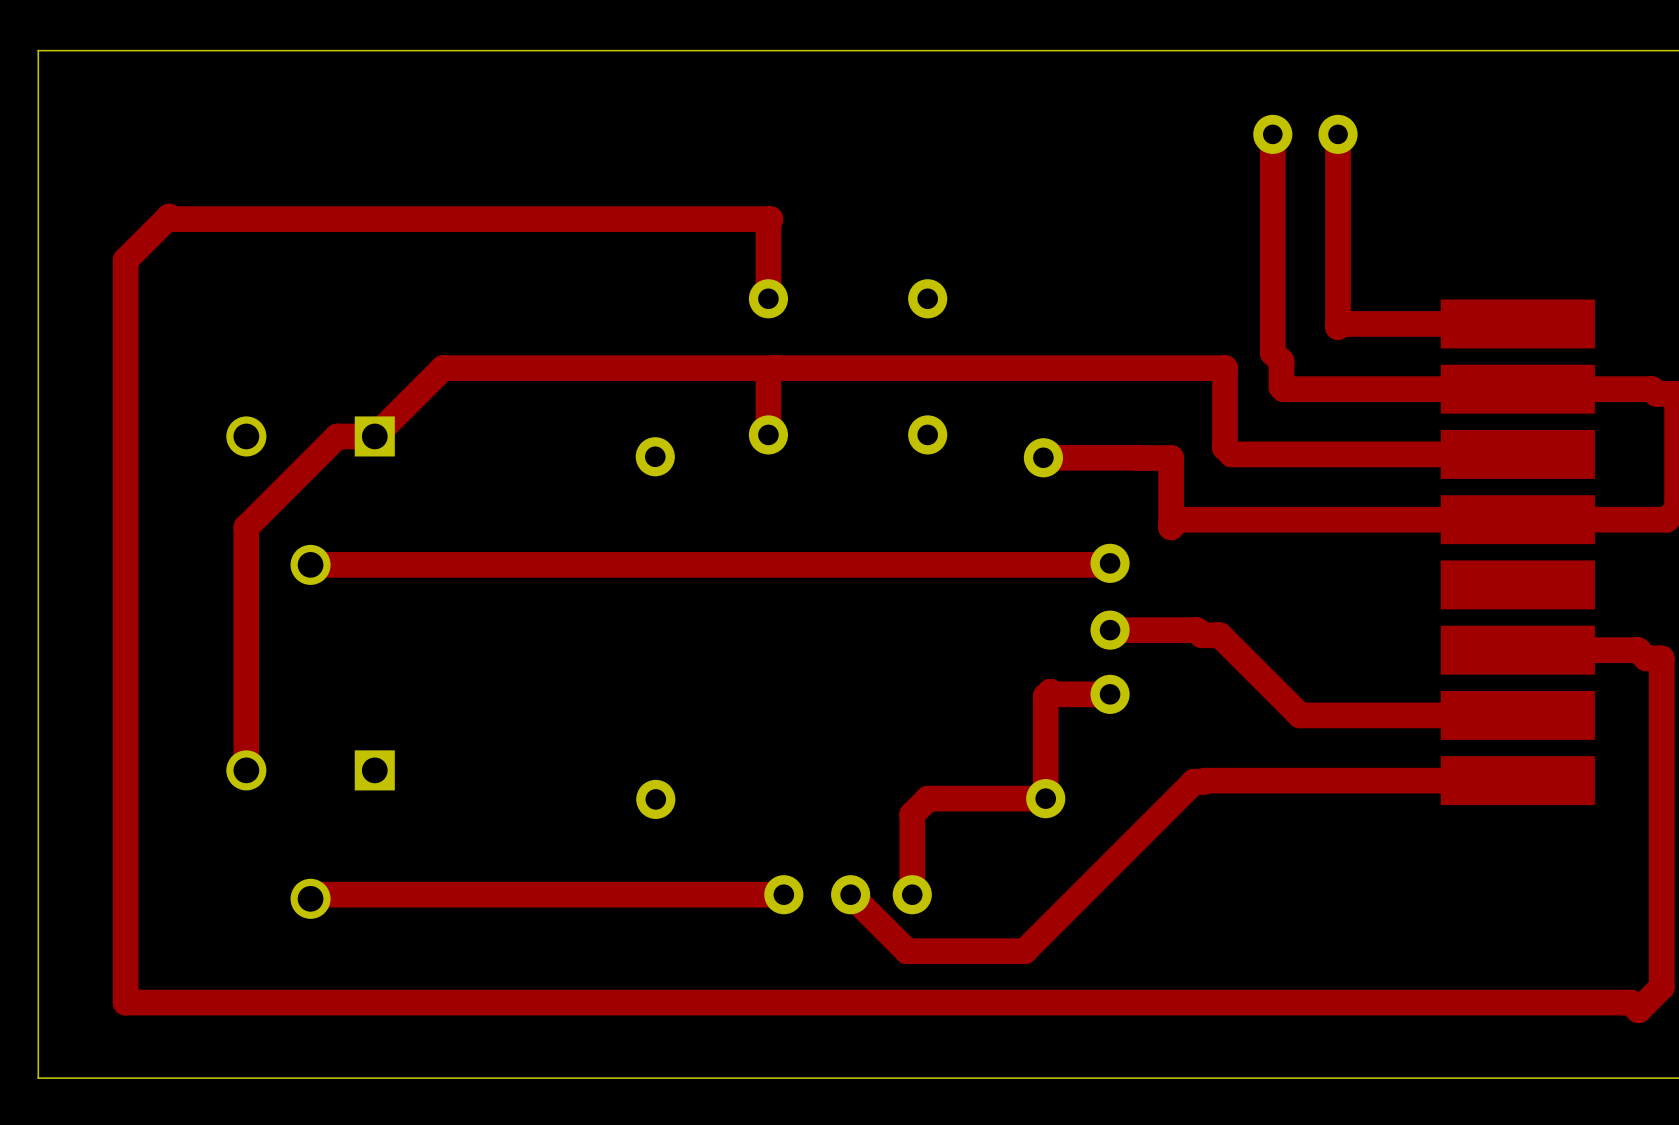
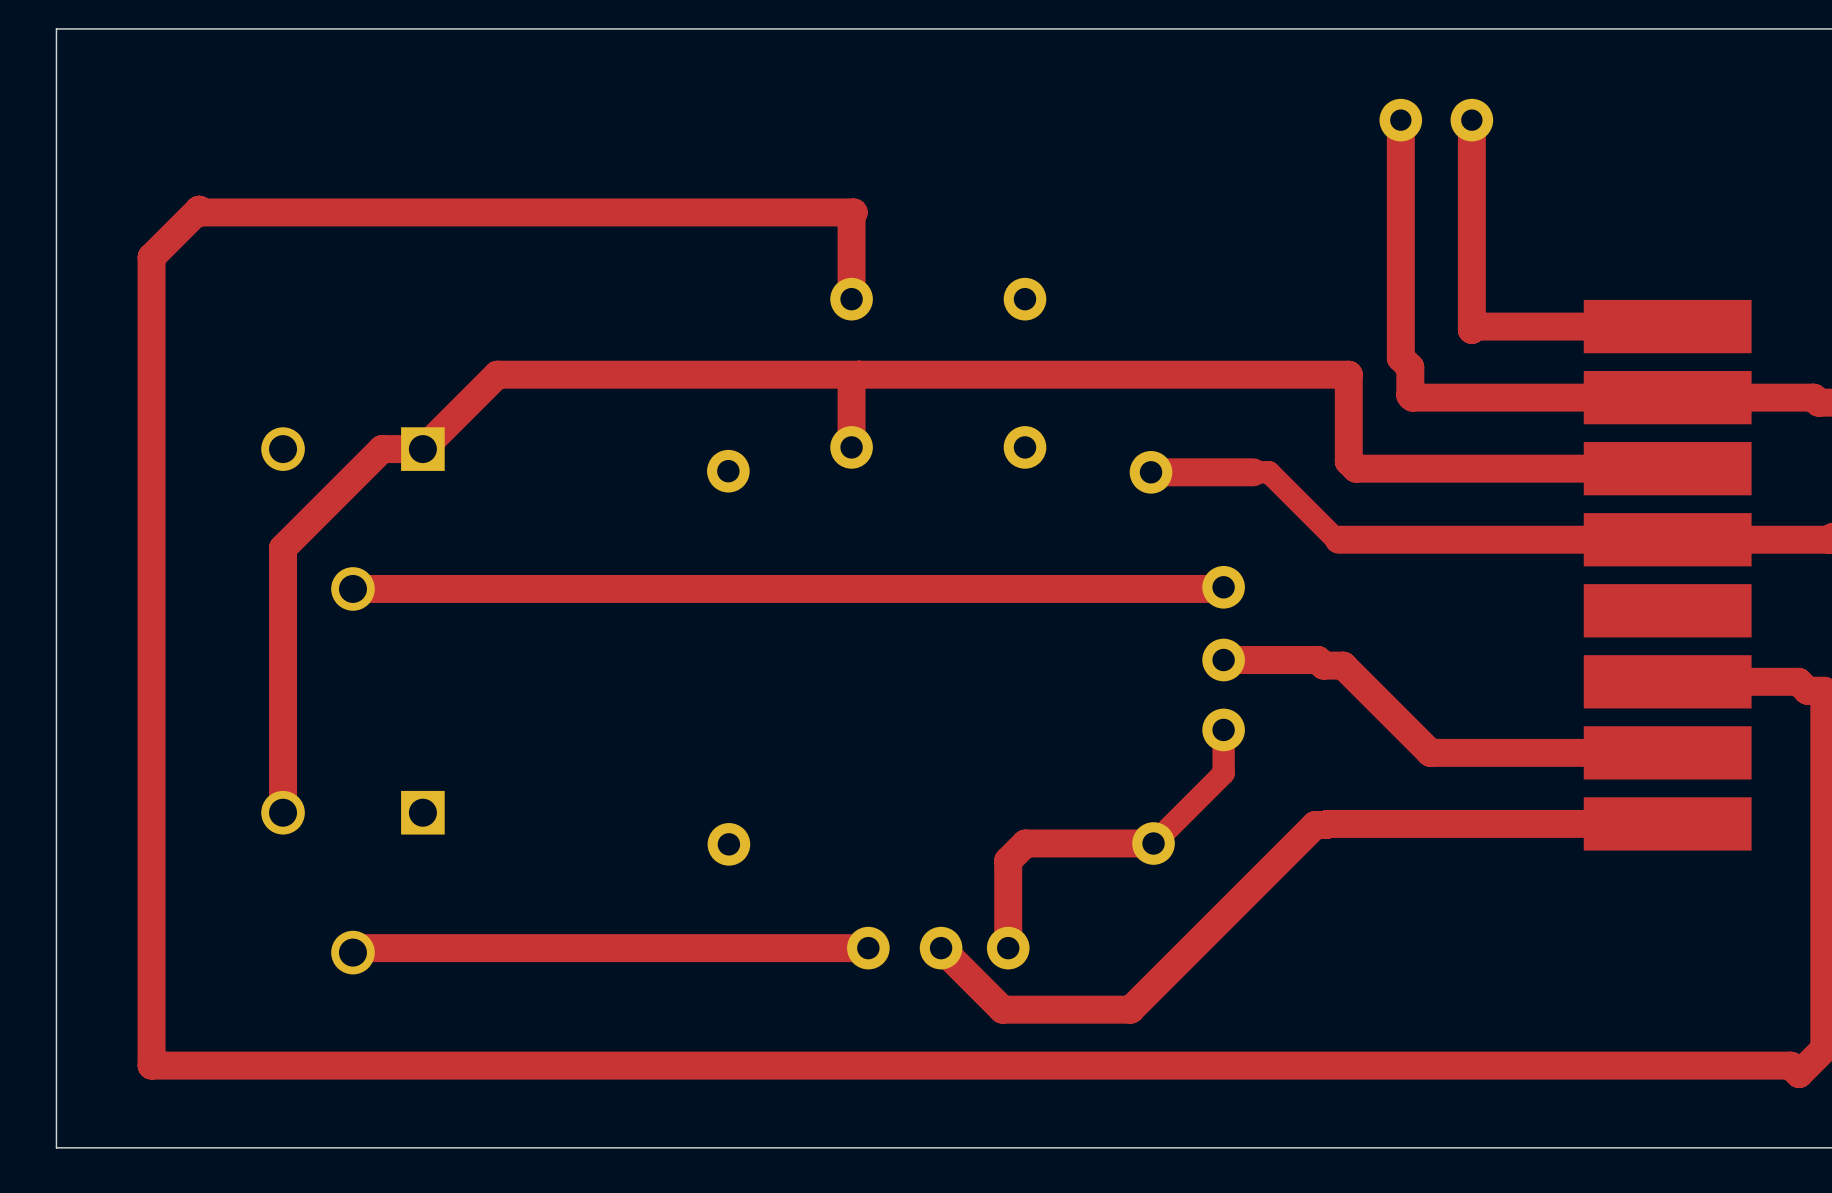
top track: (1137, 458) (1171, 458) (1171, 527) (1178, 519) (1215, 519) -> (1253, 472) (1269, 472) (1337, 540) (1338, 539)
top track: (1110, 694) (1052, 694) (1050, 691) (1045, 696) (1045, 798) -> (1223, 729) (1223, 773) (1153, 843)

